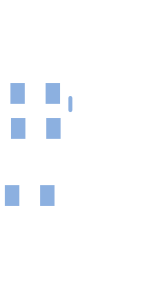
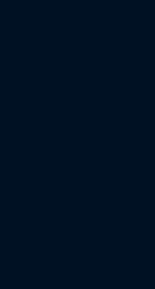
part: (35, 93) -> none
bottom track: (70, 97) (70, 110) -> none
part: (35, 128) -> none
part: (29, 195) -> none

